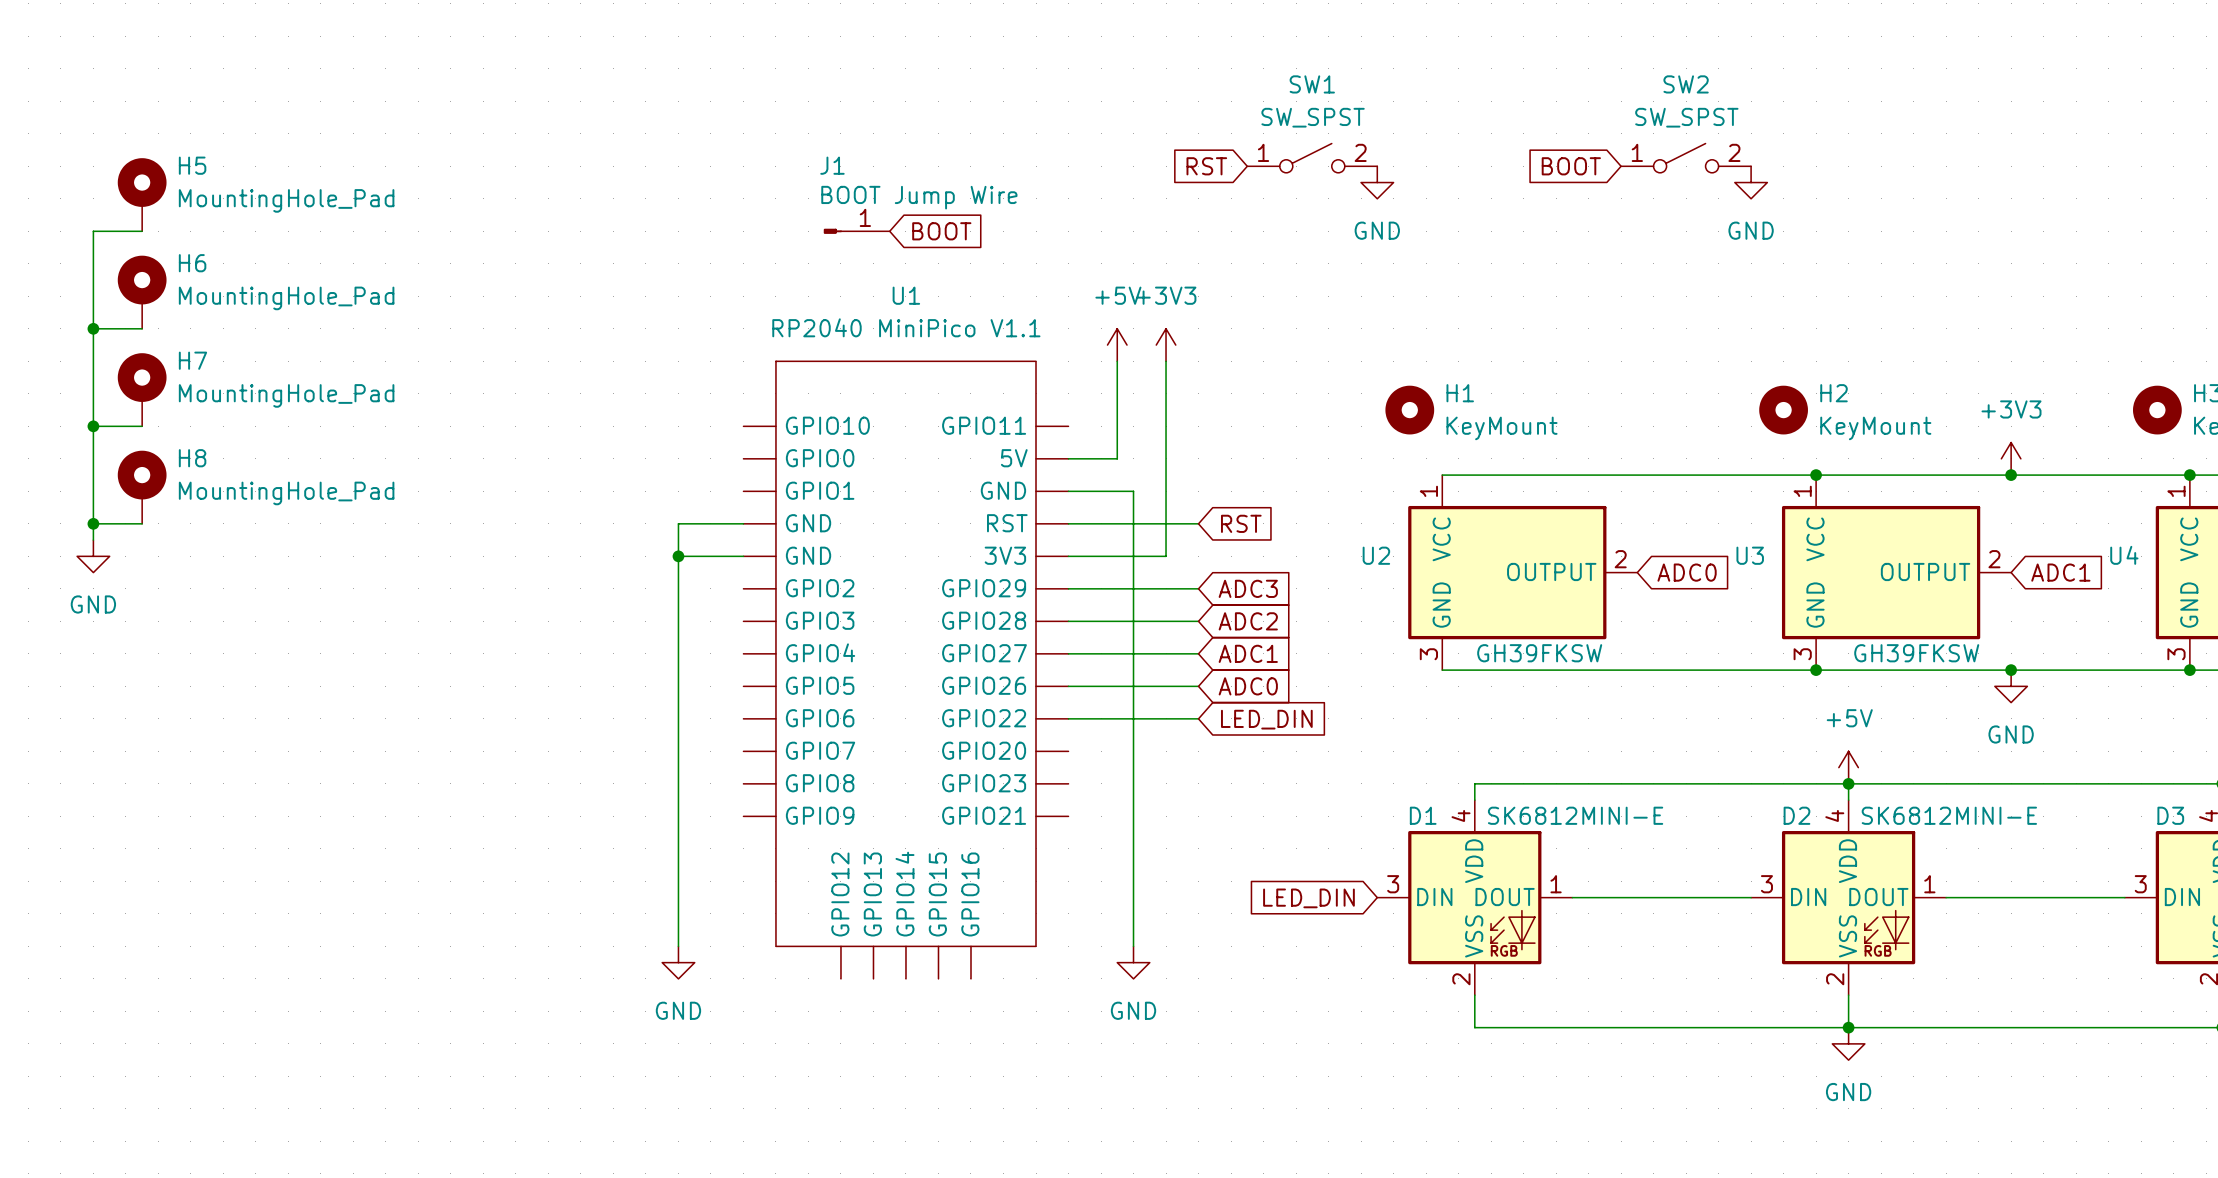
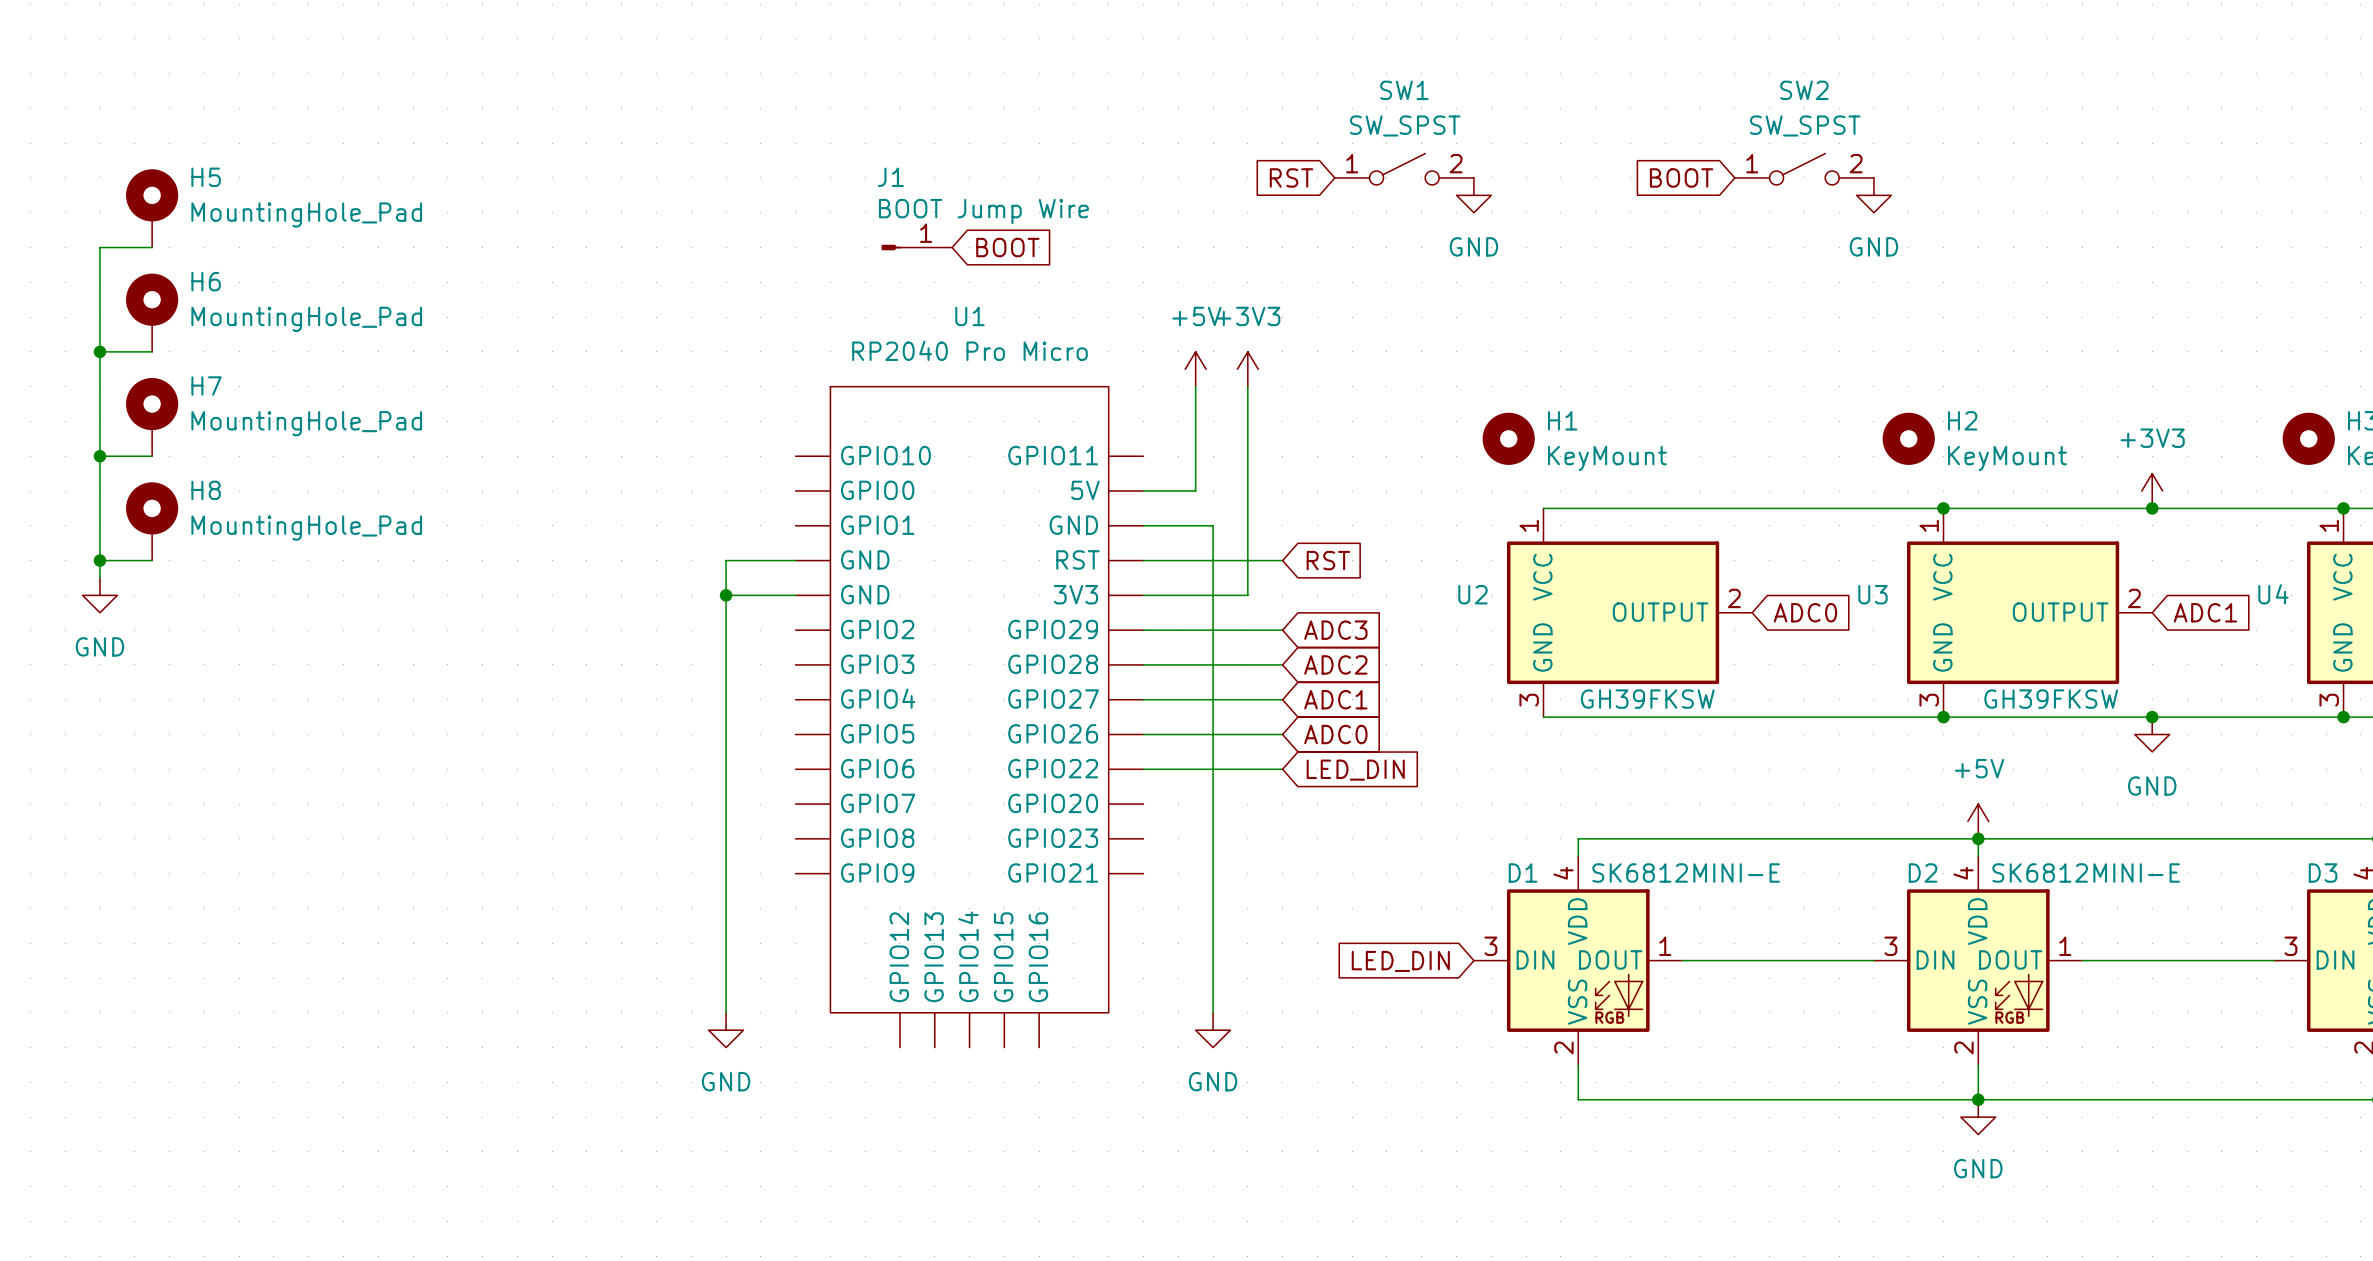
U1 value: RP2040 MiniPico V1.1 (906, 327) -> RP2040 Pro Micro (969, 350)

